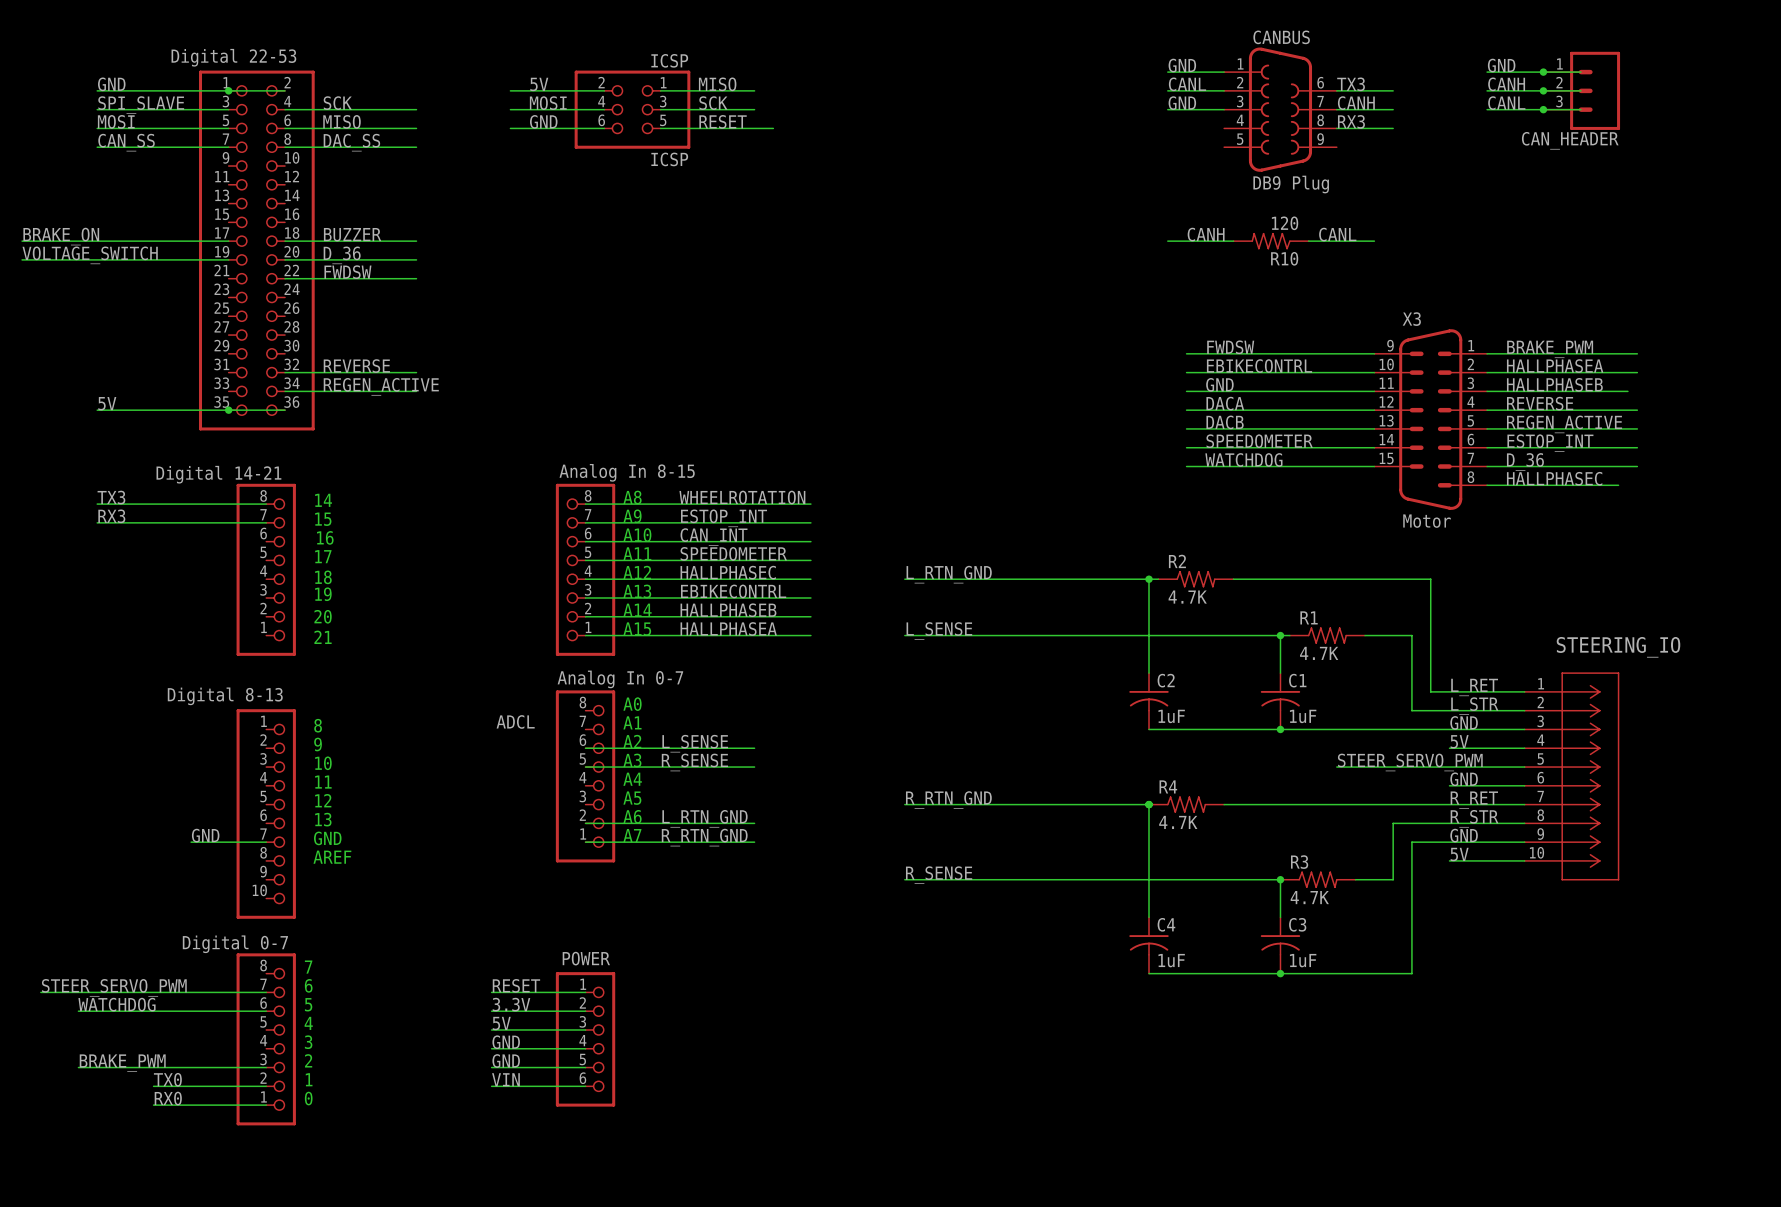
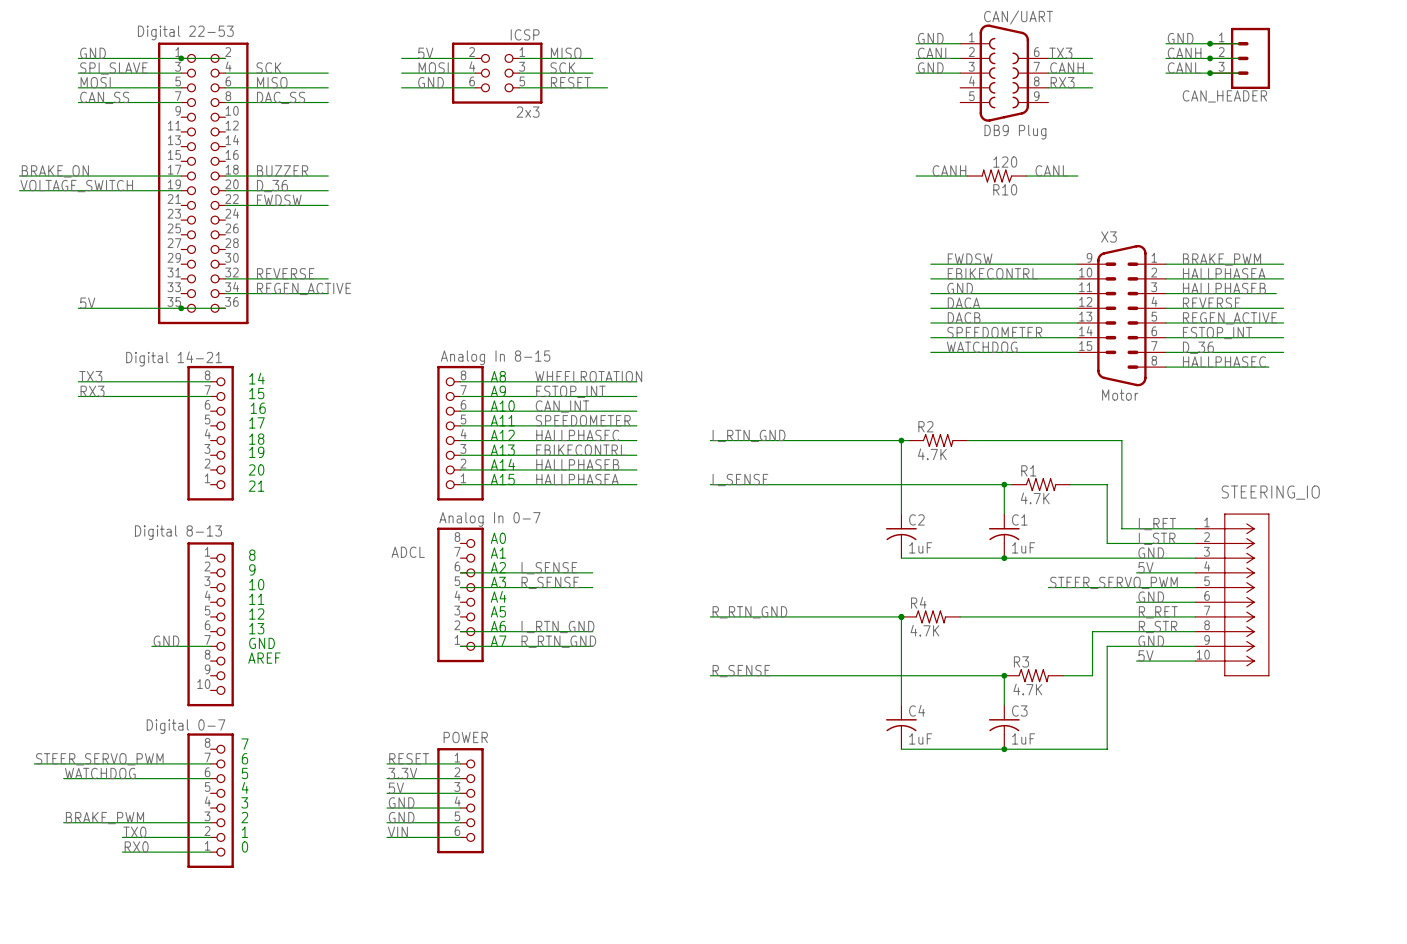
CANBUS name: CANBUS (1281, 37) -> CAN/UART (1018, 17)
ICSP value: ICSP (669, 159) -> 2x3 (528, 112)

